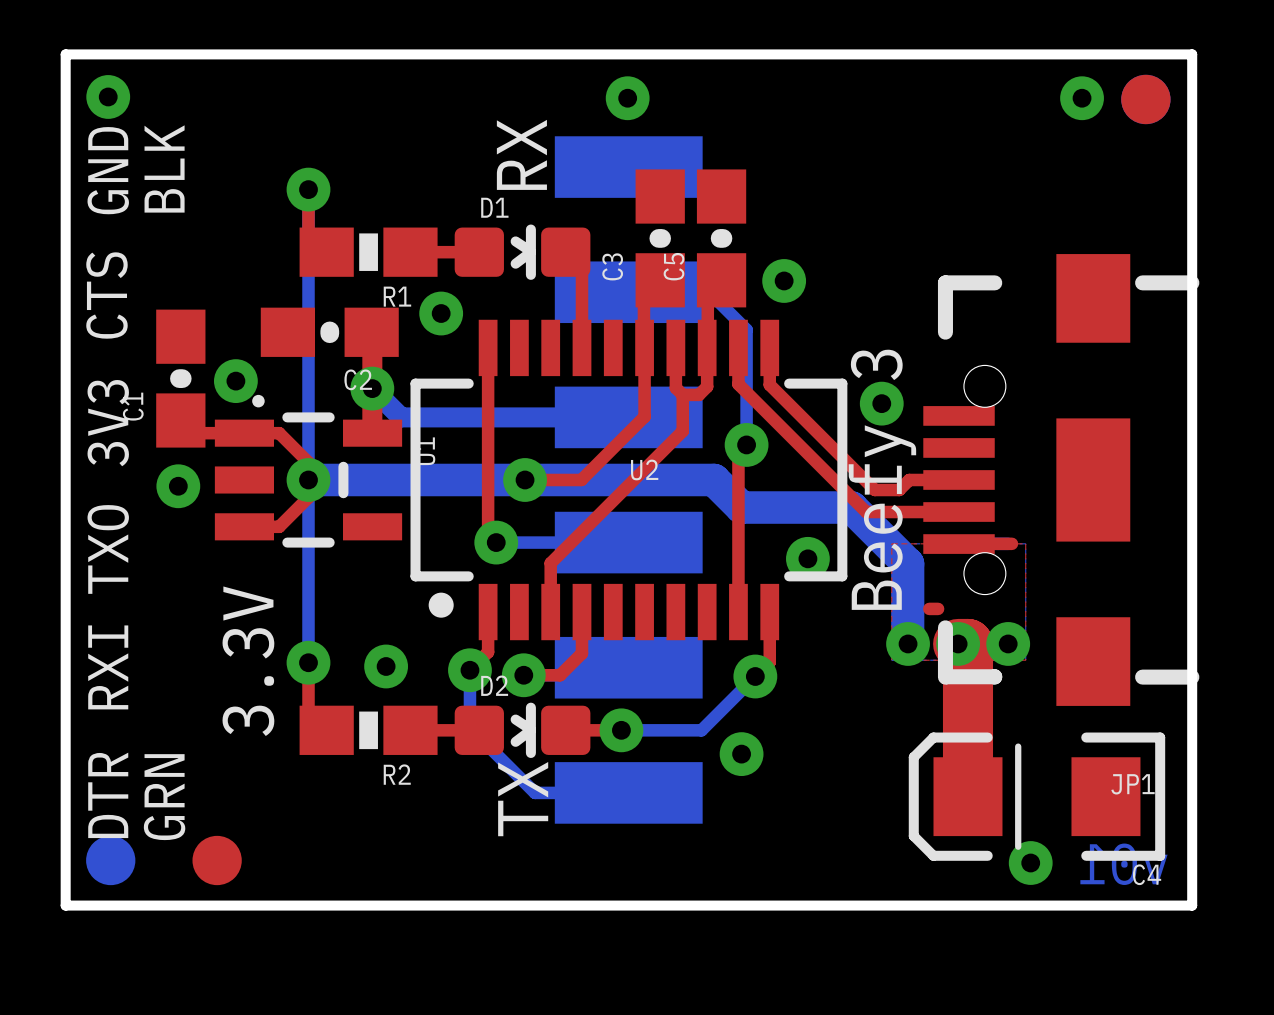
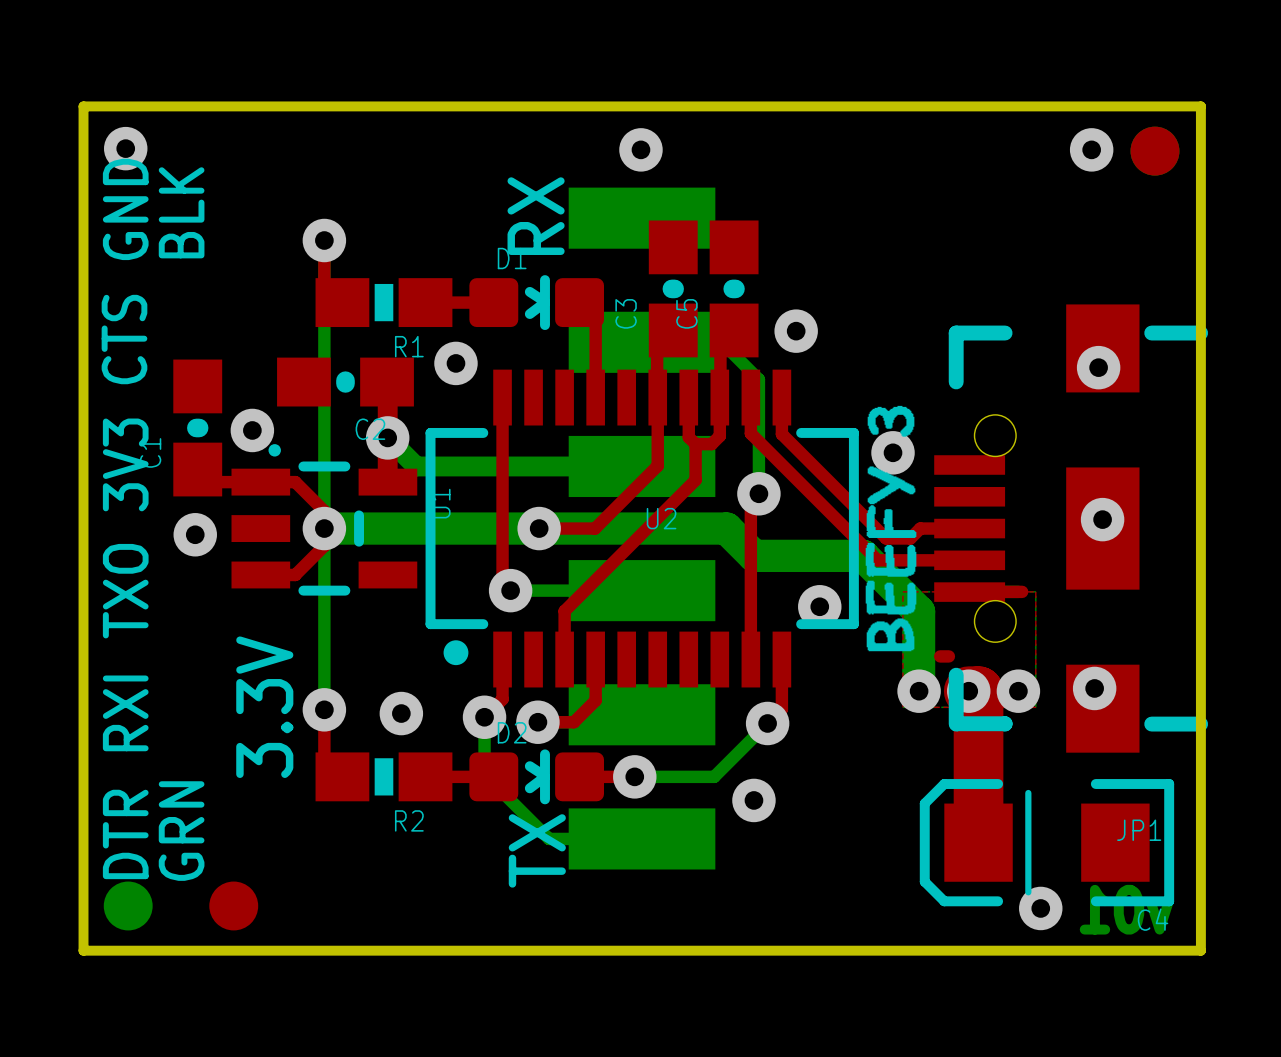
via: none -> (1098, 367)
drawing: none -> [865, 405, 917, 652]
via: none -> (1102, 519)
text: Beefy 3 (882, 479) -> none
via: none -> (1094, 688)

